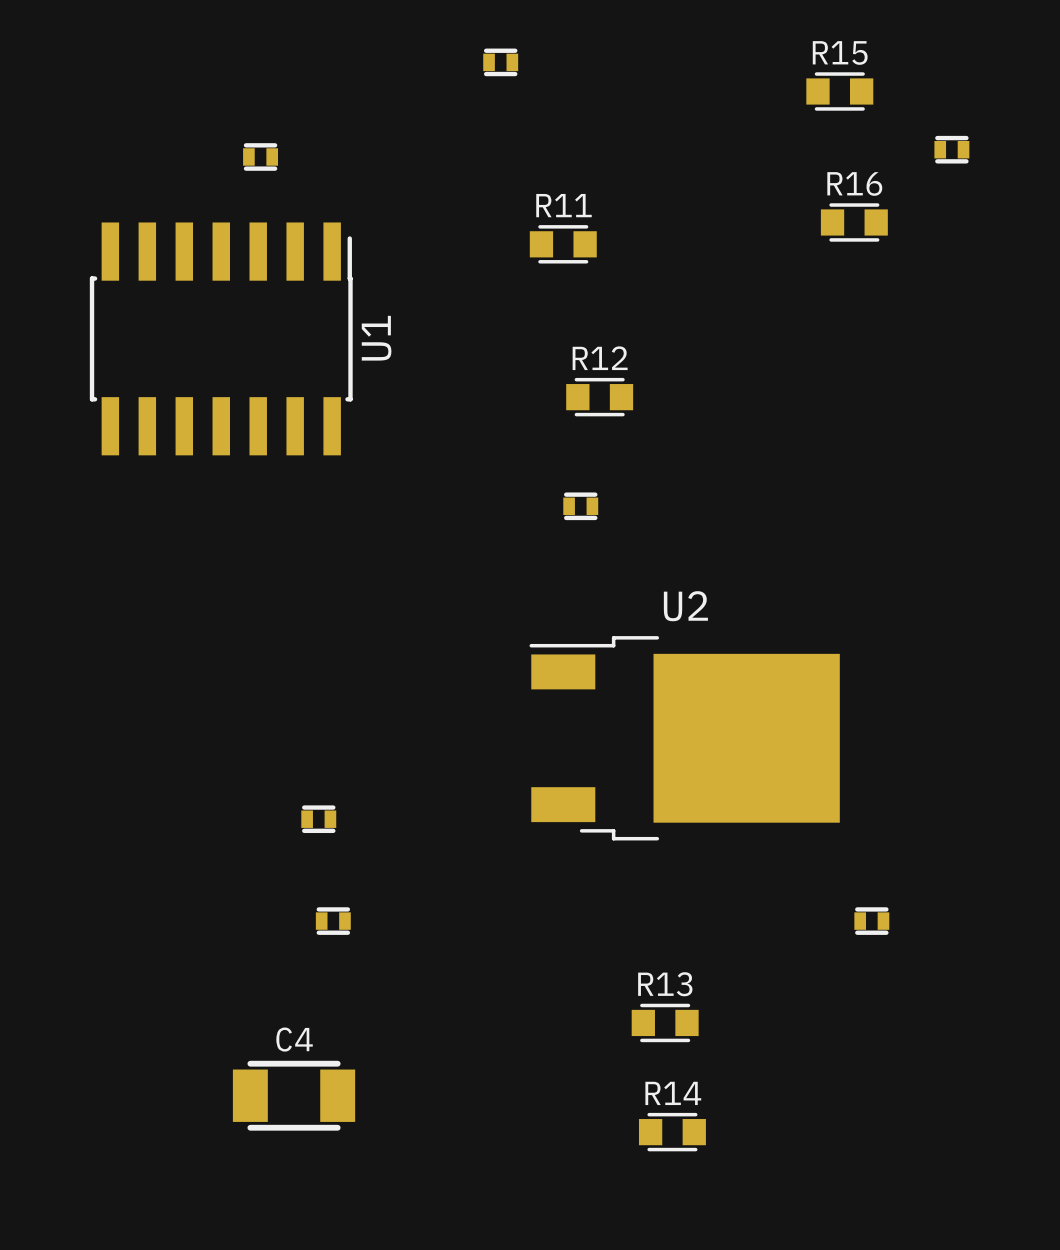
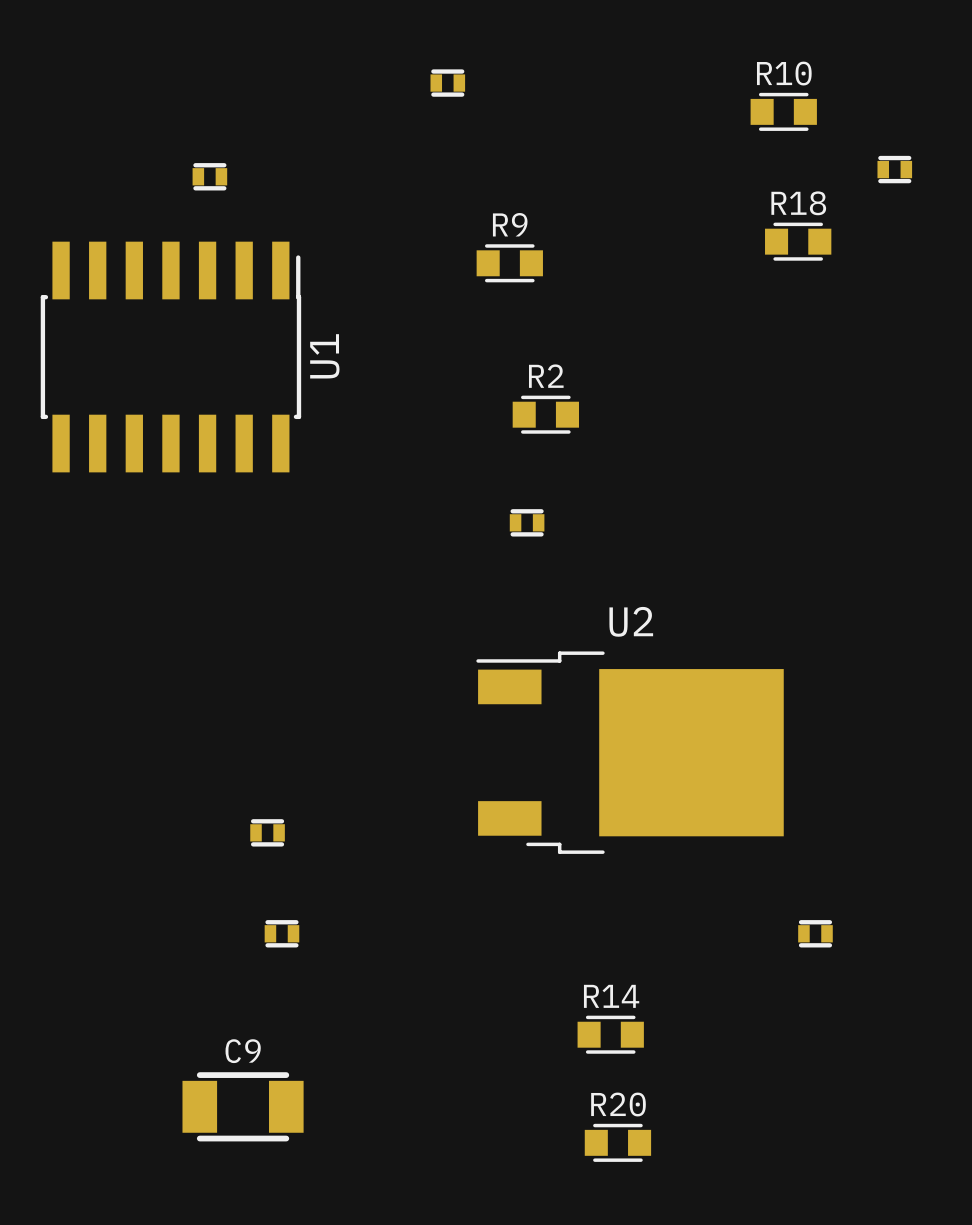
R15 name: R15 (840, 52) -> R10 (784, 73)
R16 name: R16 (854, 183) -> R18 (798, 203)
R11 name: R11 (564, 205) -> R9 (510, 224)
R12 name: R12 (600, 358) -> R2 (546, 376)
R13 name: R13 (665, 984) -> R14 (611, 996)
C4 name: C4 (294, 1039) -> C9 (243, 1051)
R14 name: R14 (673, 1093) -> R20 (618, 1104)

